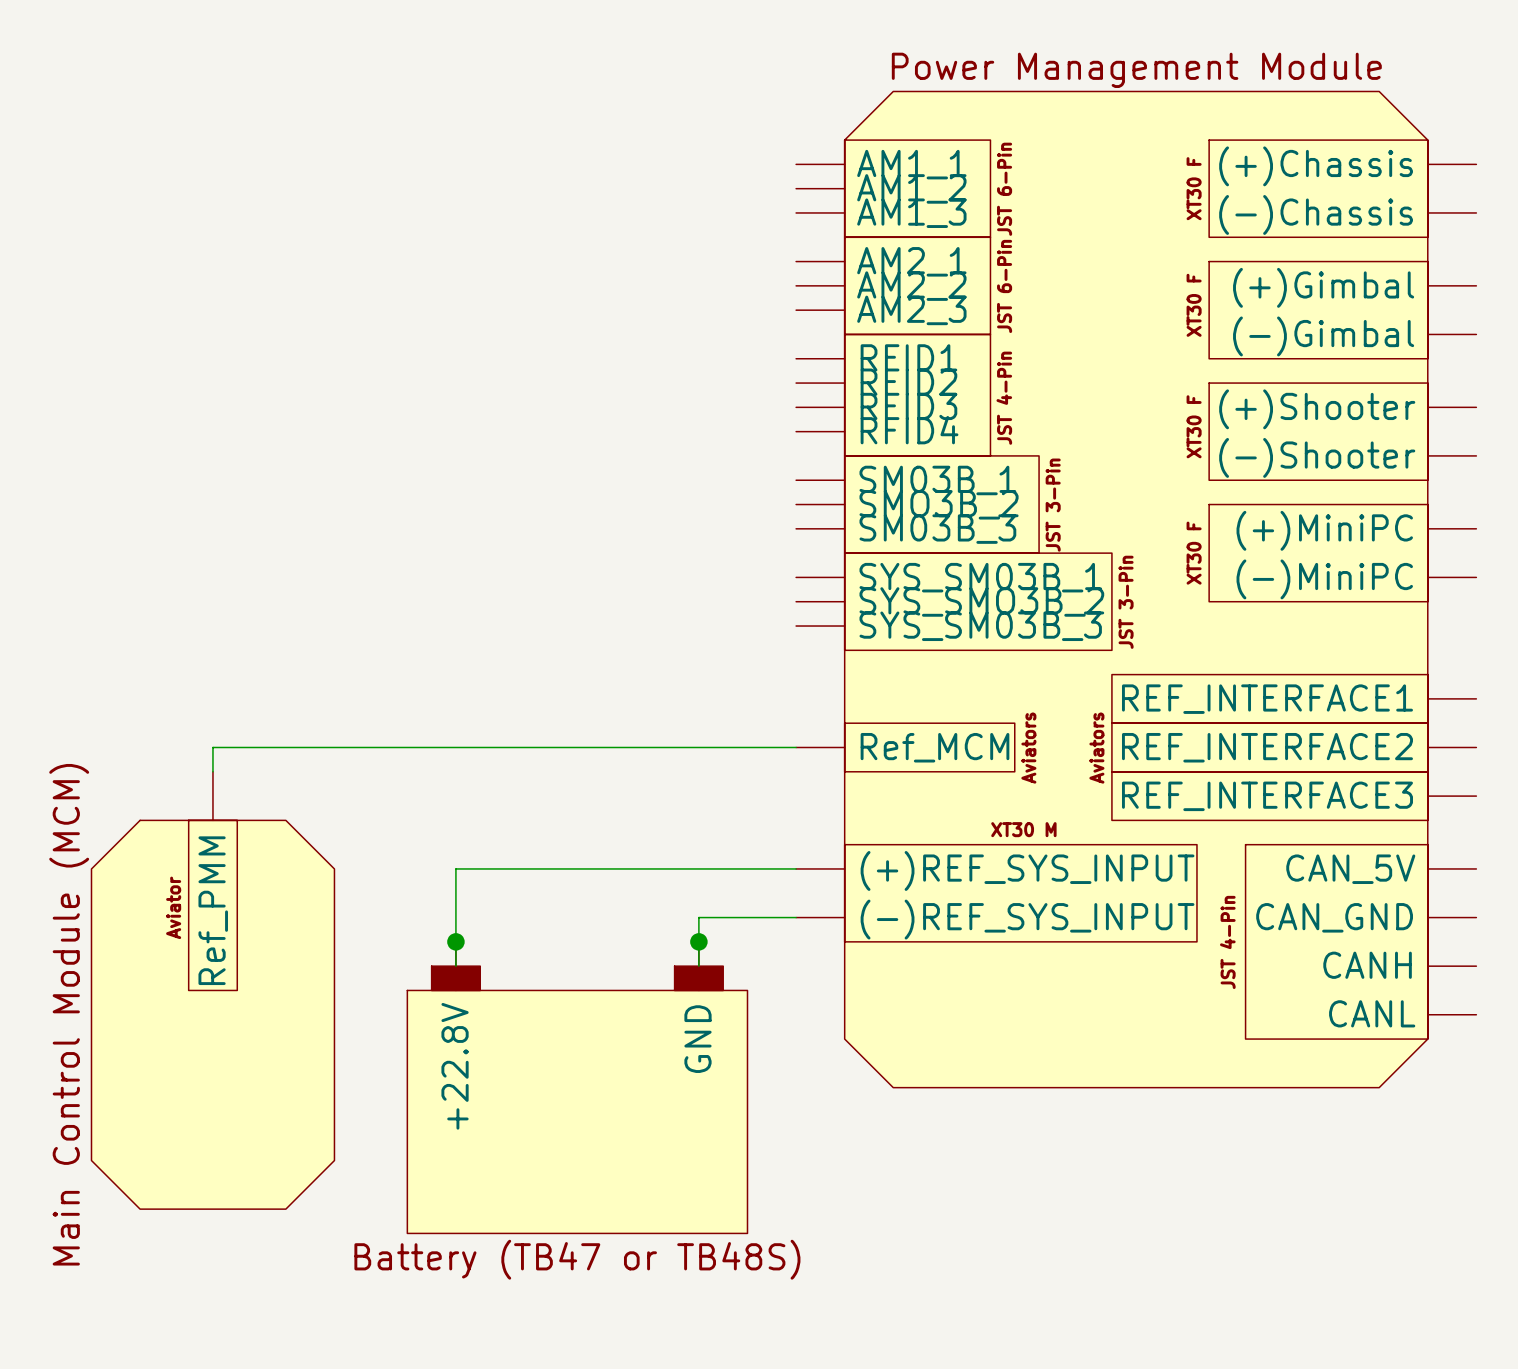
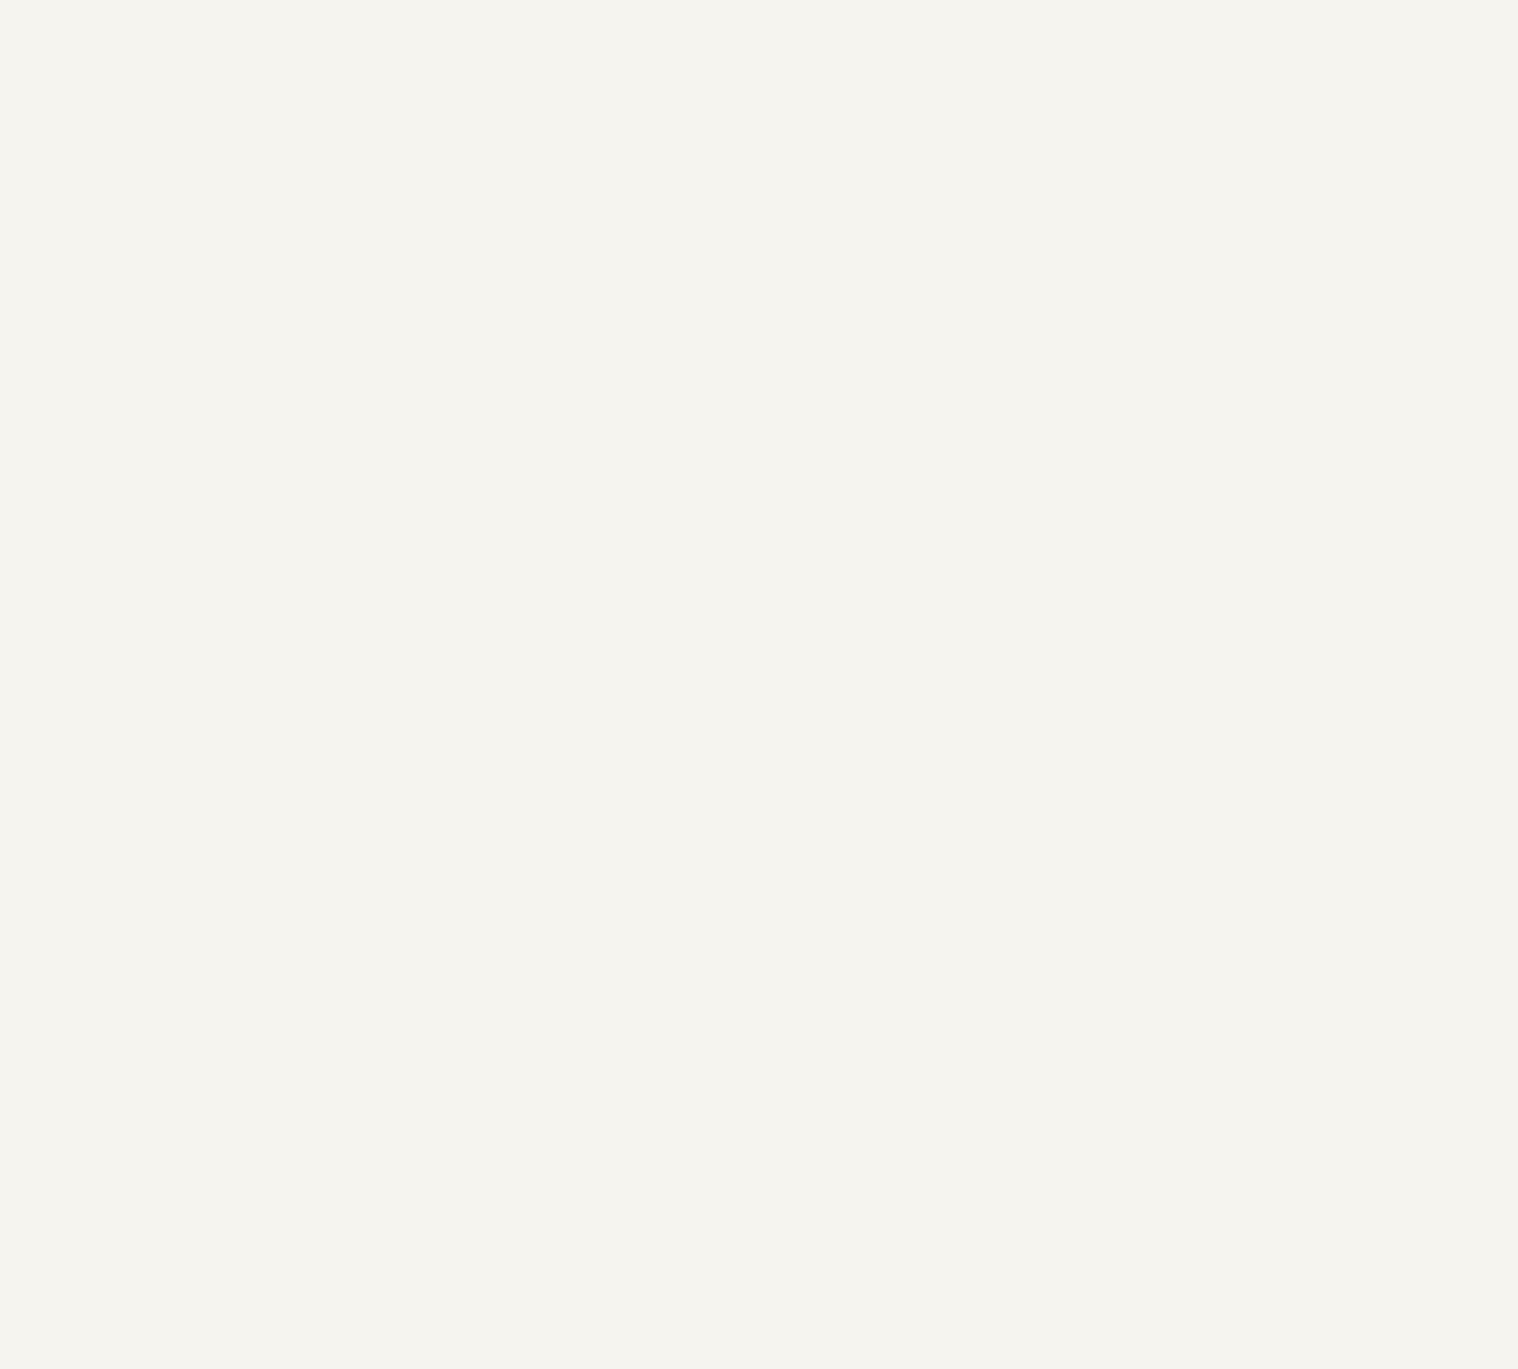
part: (1136, 589) -> none
wire: (796, 747) (212, 747) (212, 771) -> none
wire: (796, 868) (455, 868) (455, 966) -> none
wire: (796, 917) (698, 917) (698, 966) -> none
junction: (455, 941) -> none
junction: (698, 941) -> none
part: (212, 990) -> none
part: (577, 1087) -> none

